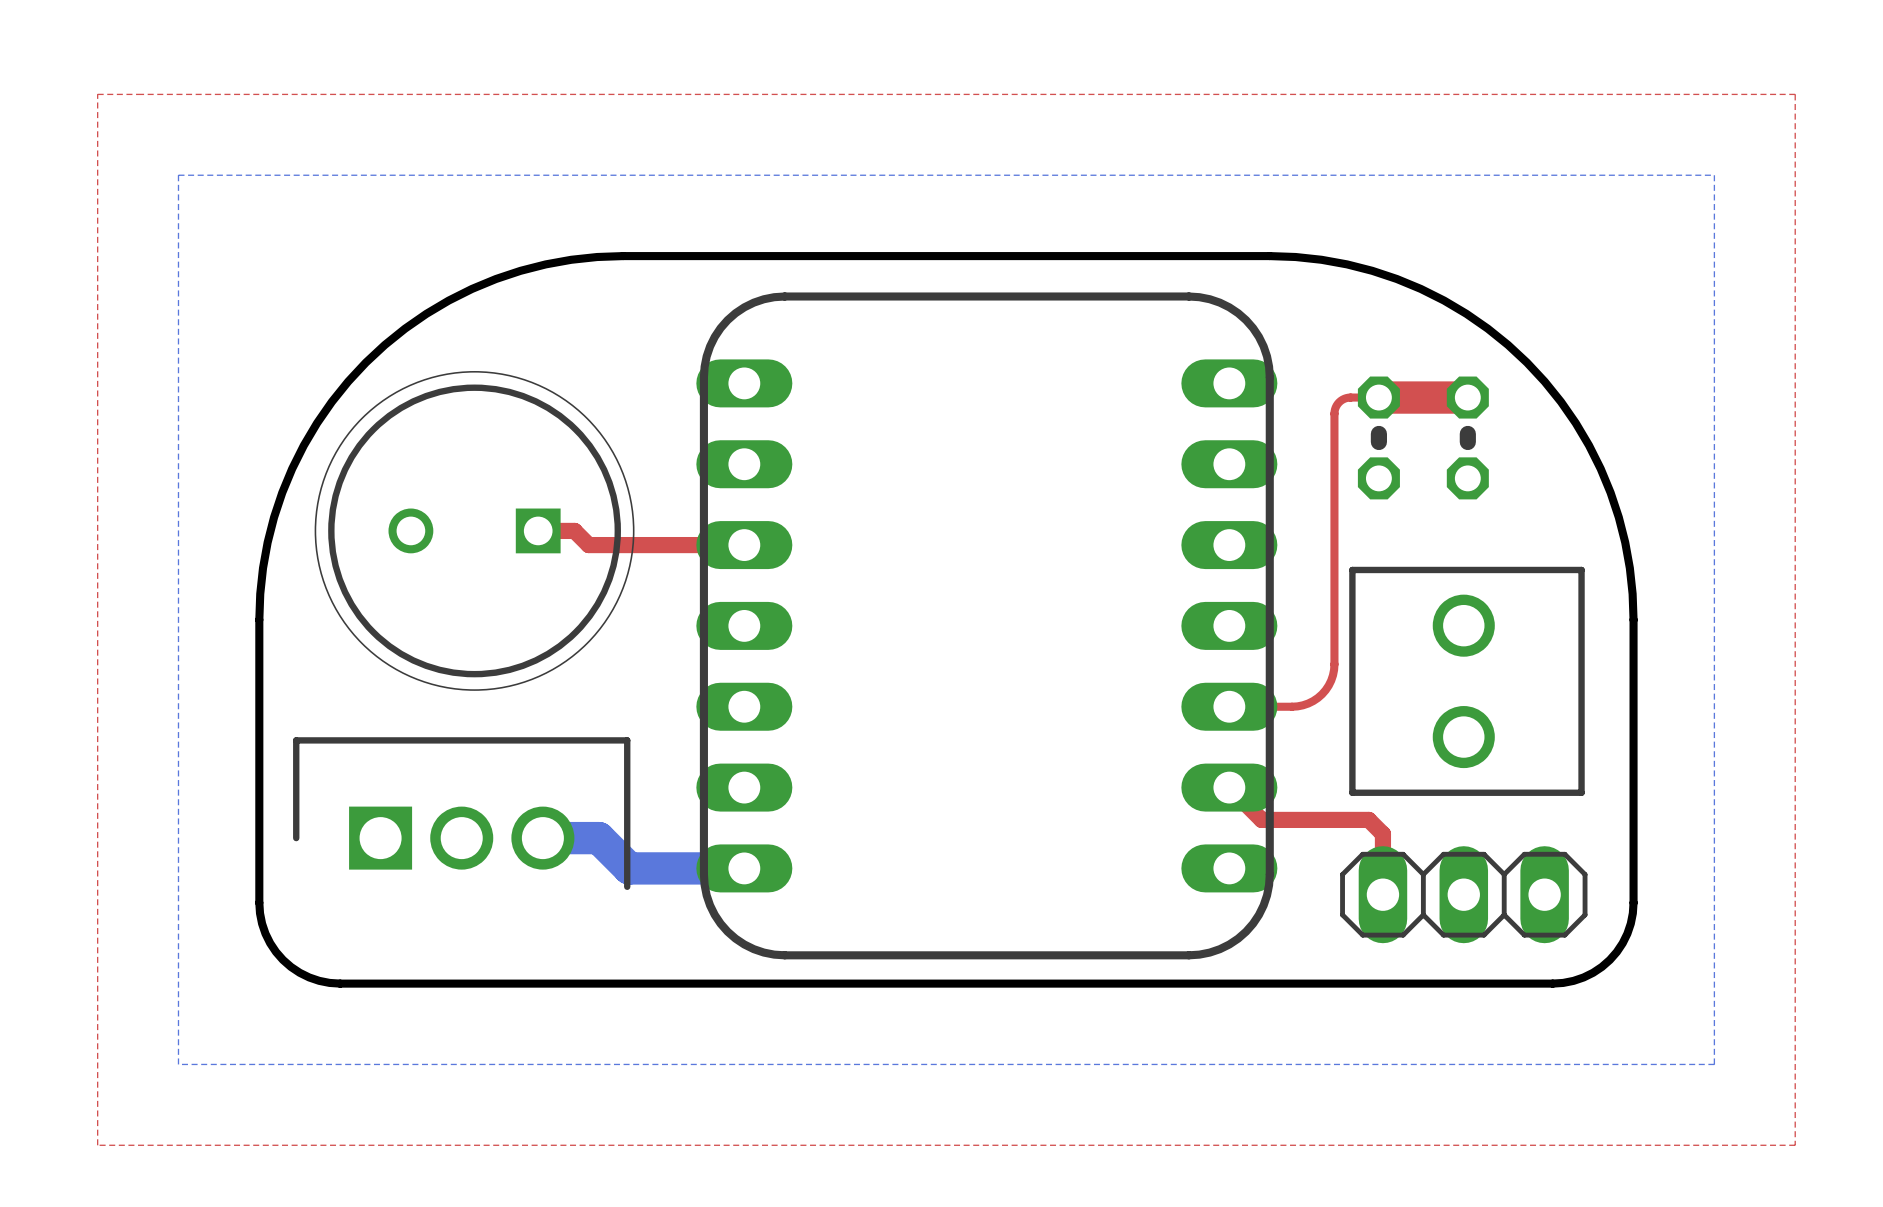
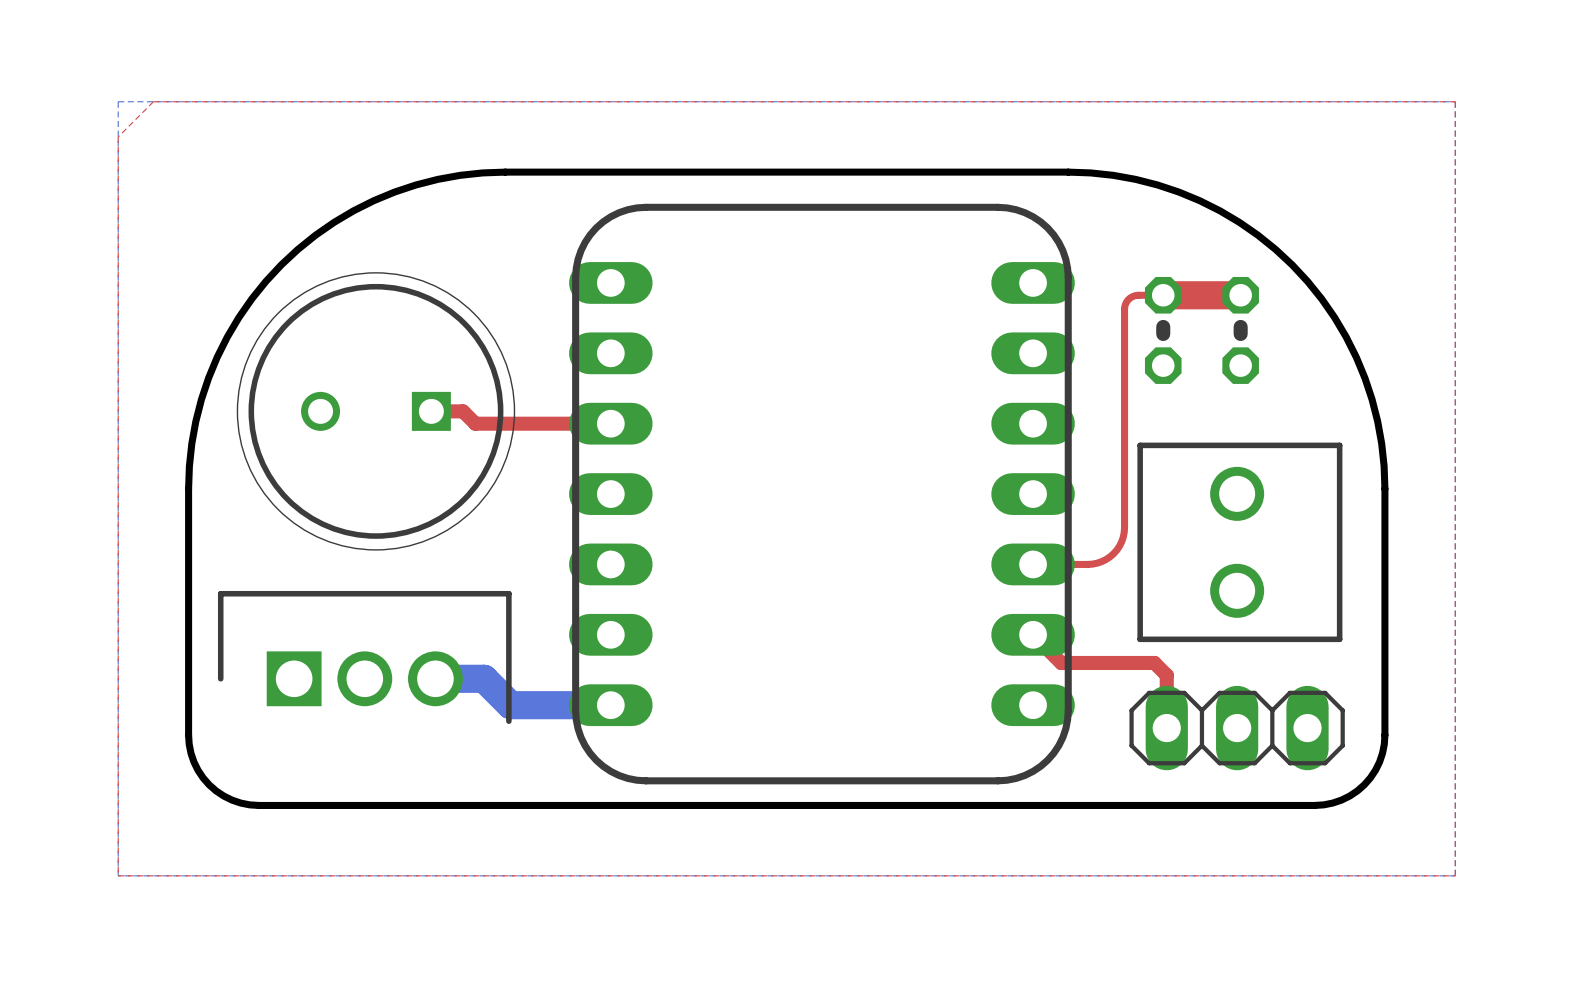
top zone outline: (97, 94) (1795, 94) (1795, 1145) (97, 1145) (97, 94) -> (153, 101) (118, 136) (118, 875) (1455, 875) (1455, 101) (153, 101)

